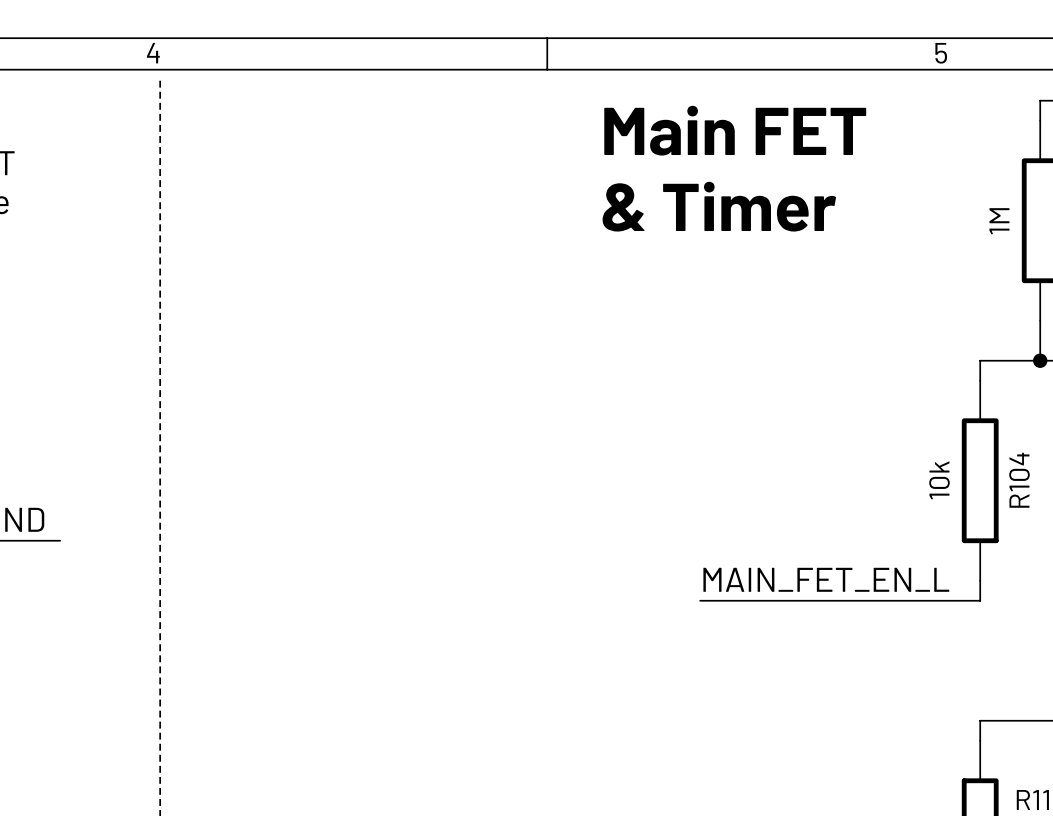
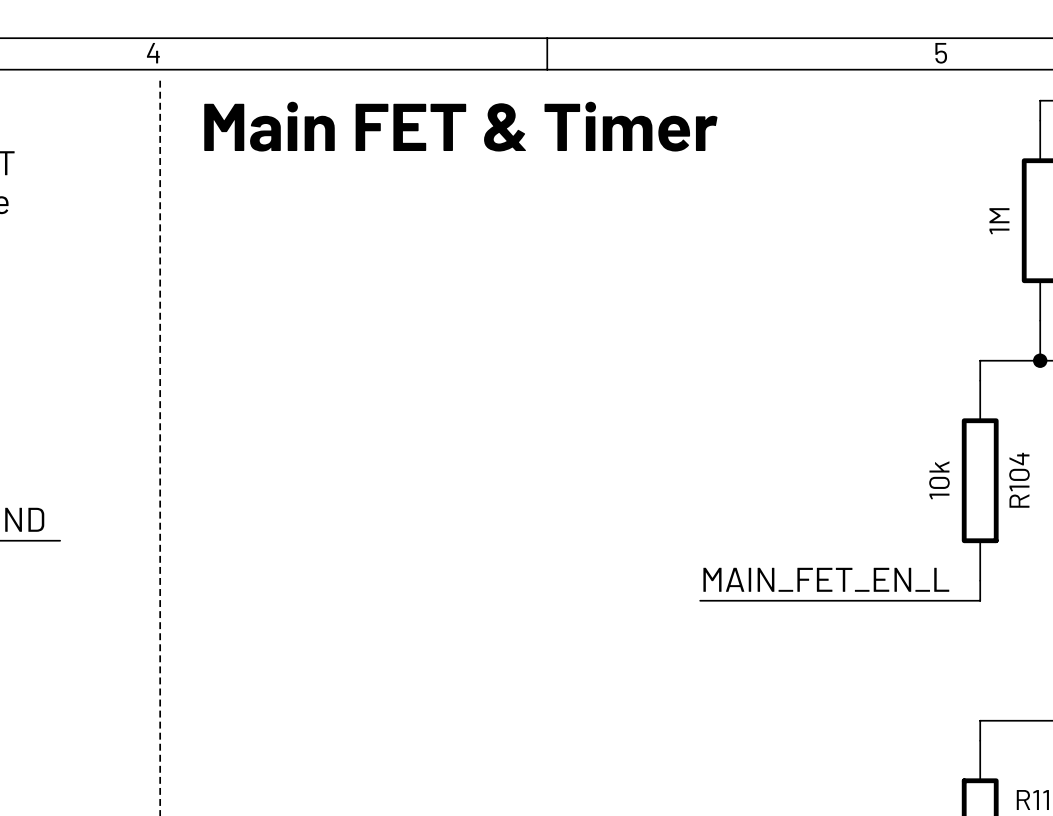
text: none -> Main FET & Timer (460, 126)
text: Main FET (735, 130) -> none
text: & Timer (719, 206) -> none

